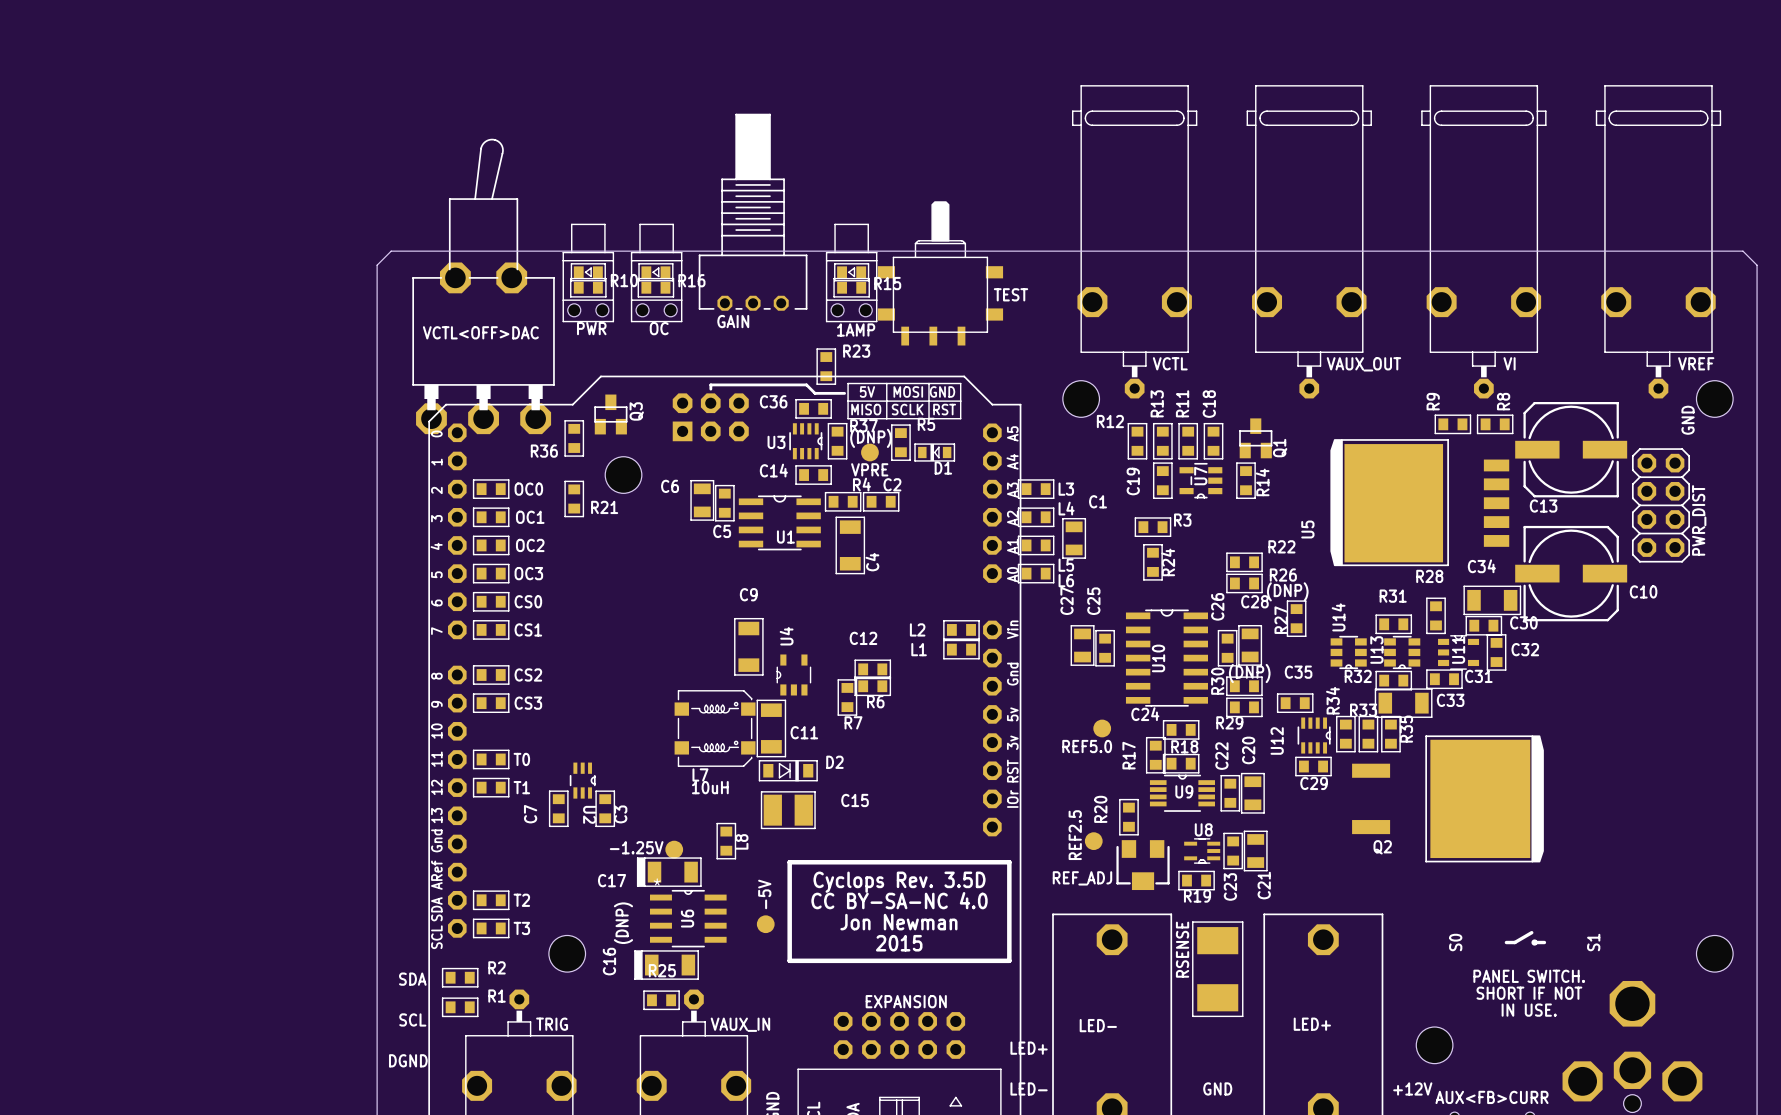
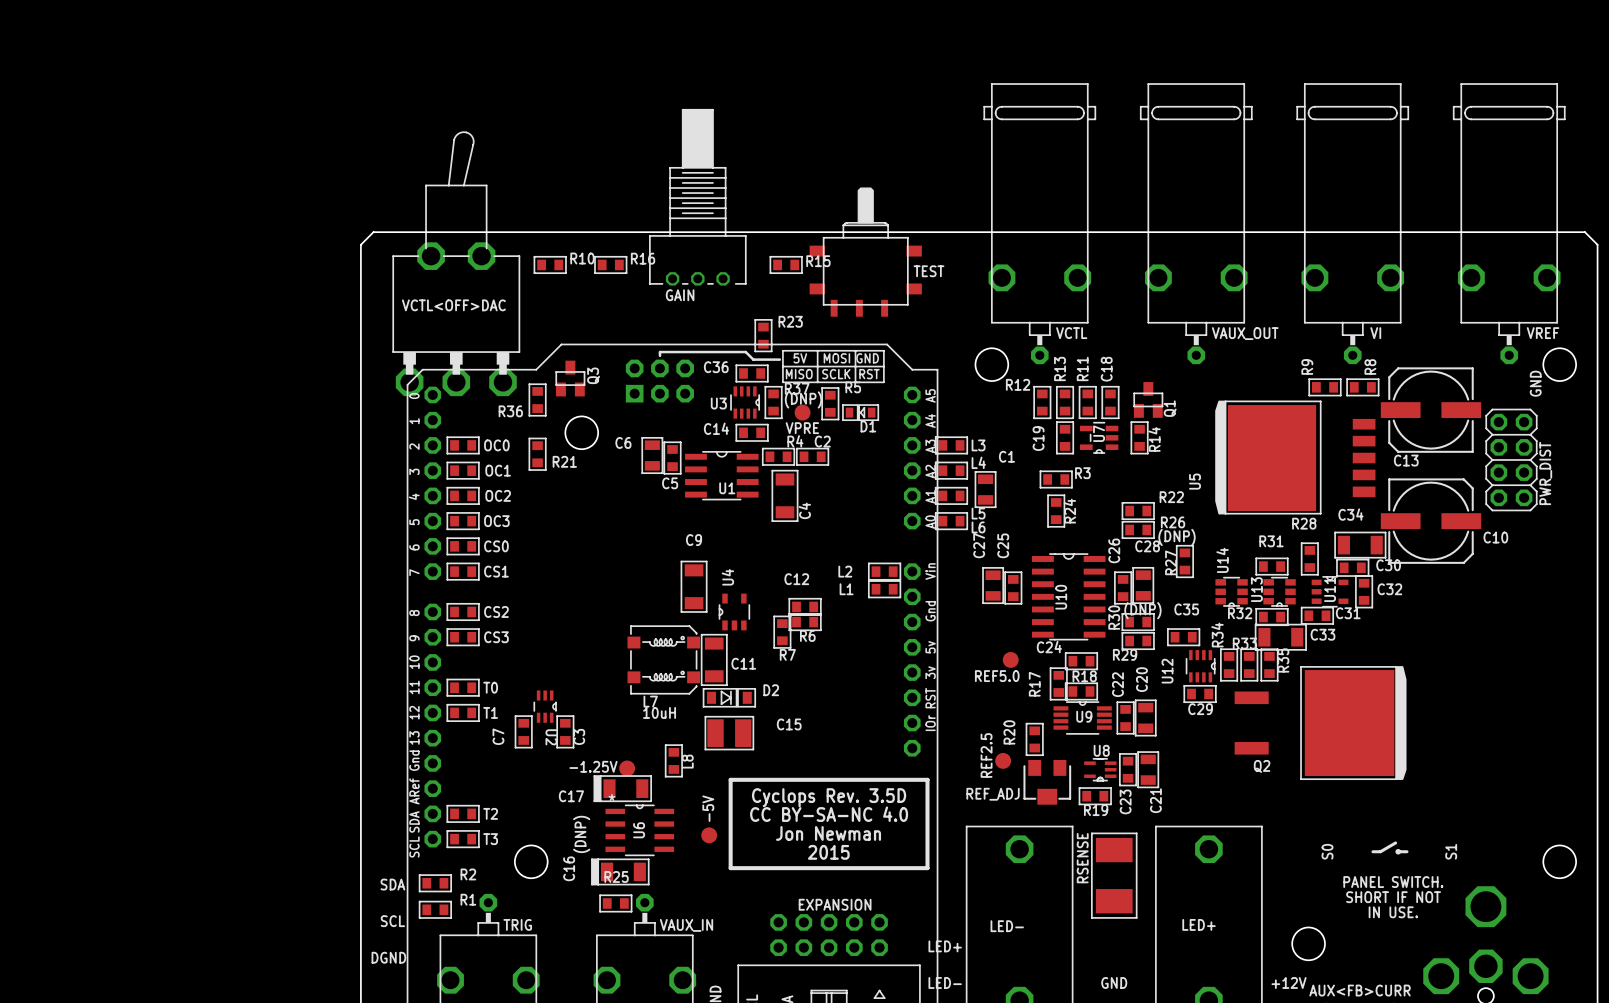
PWR: (588, 272) -> none
part: (588, 272) -> none
OC: (655, 272) -> none
part: (656, 272) -> none
1AMP: (851, 272) -> none
part: (851, 272) -> none

